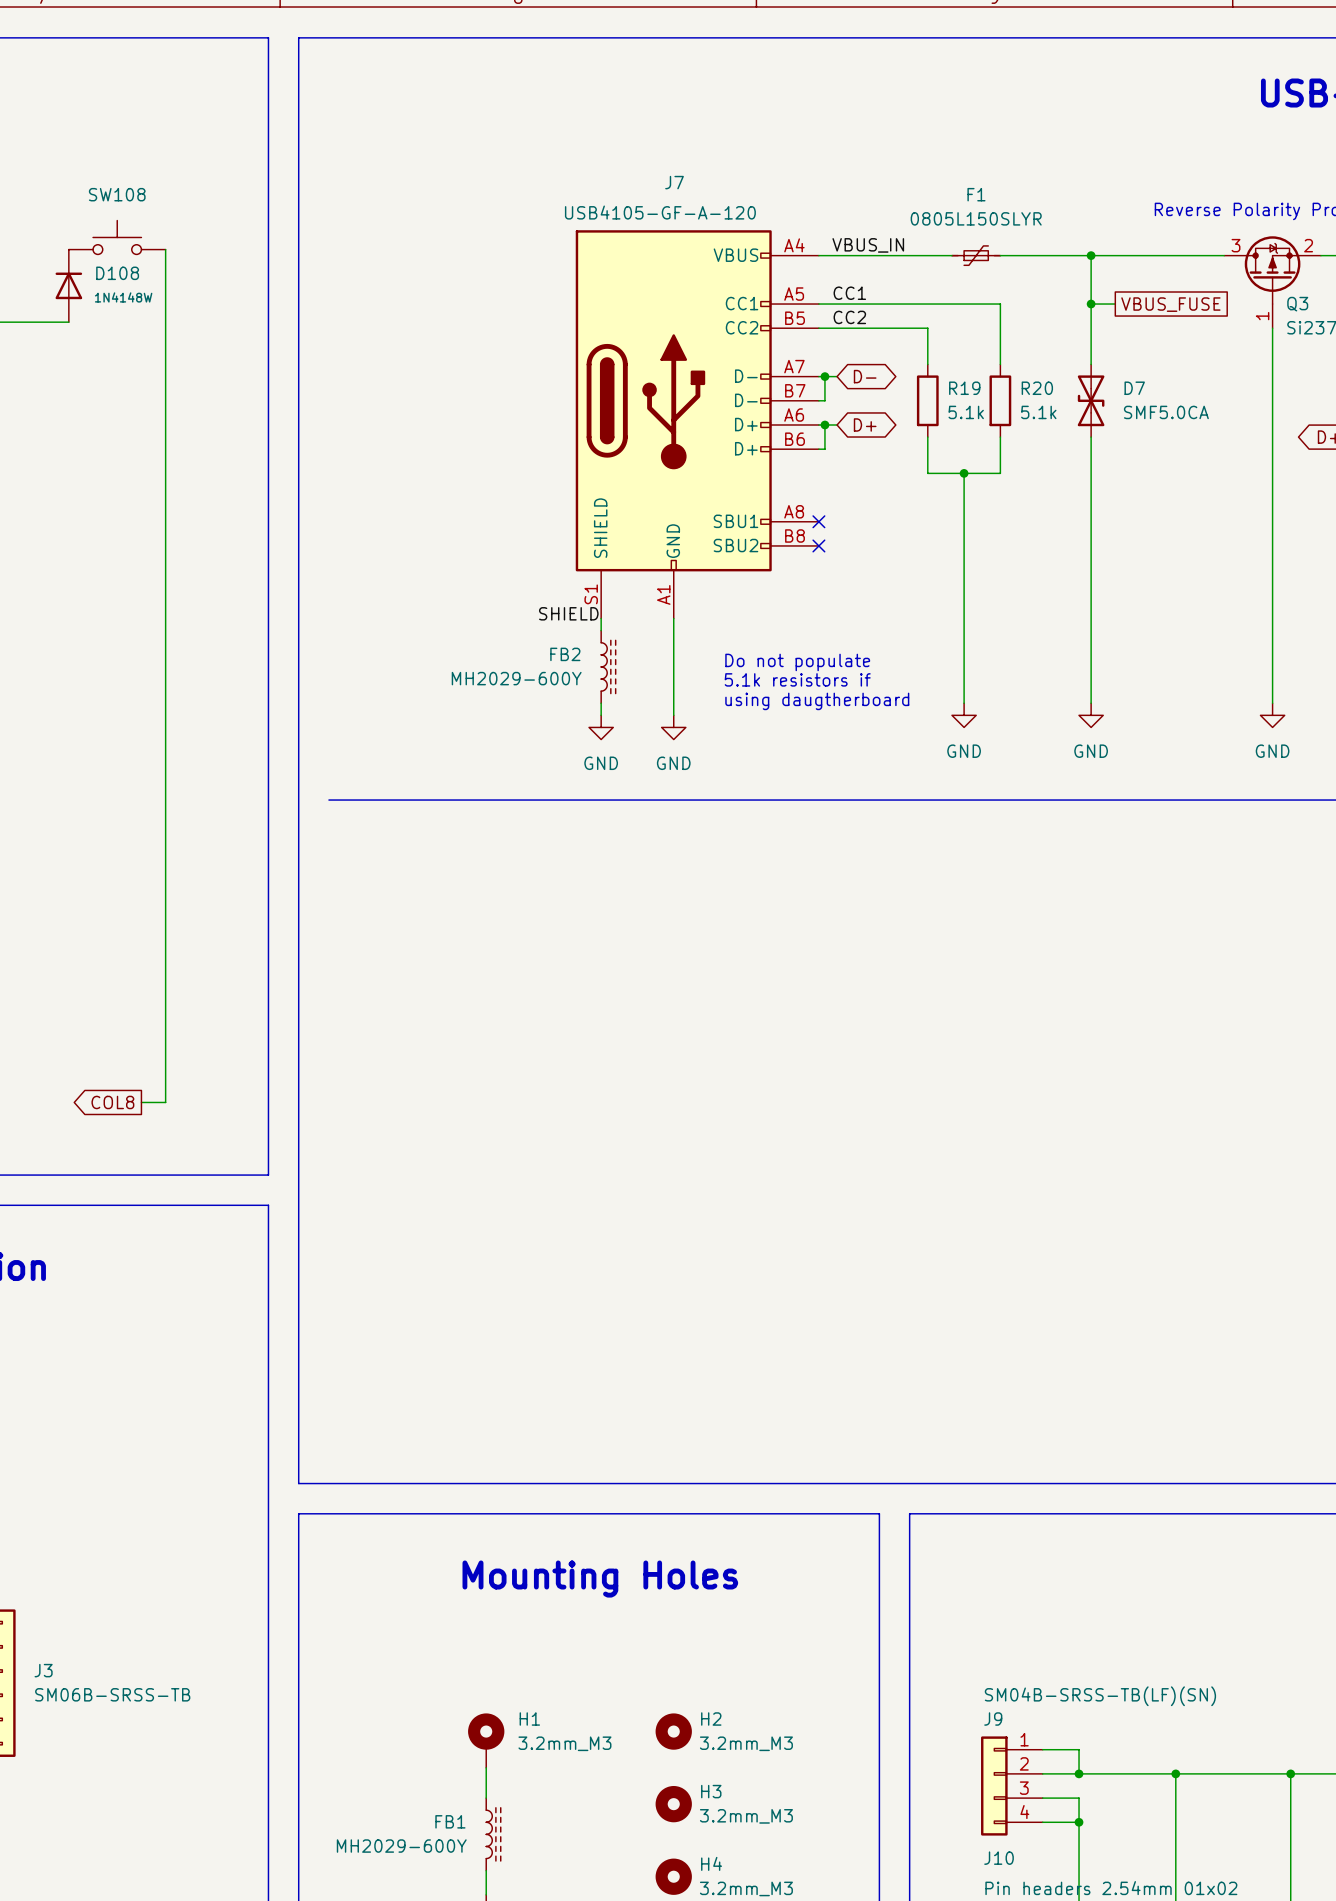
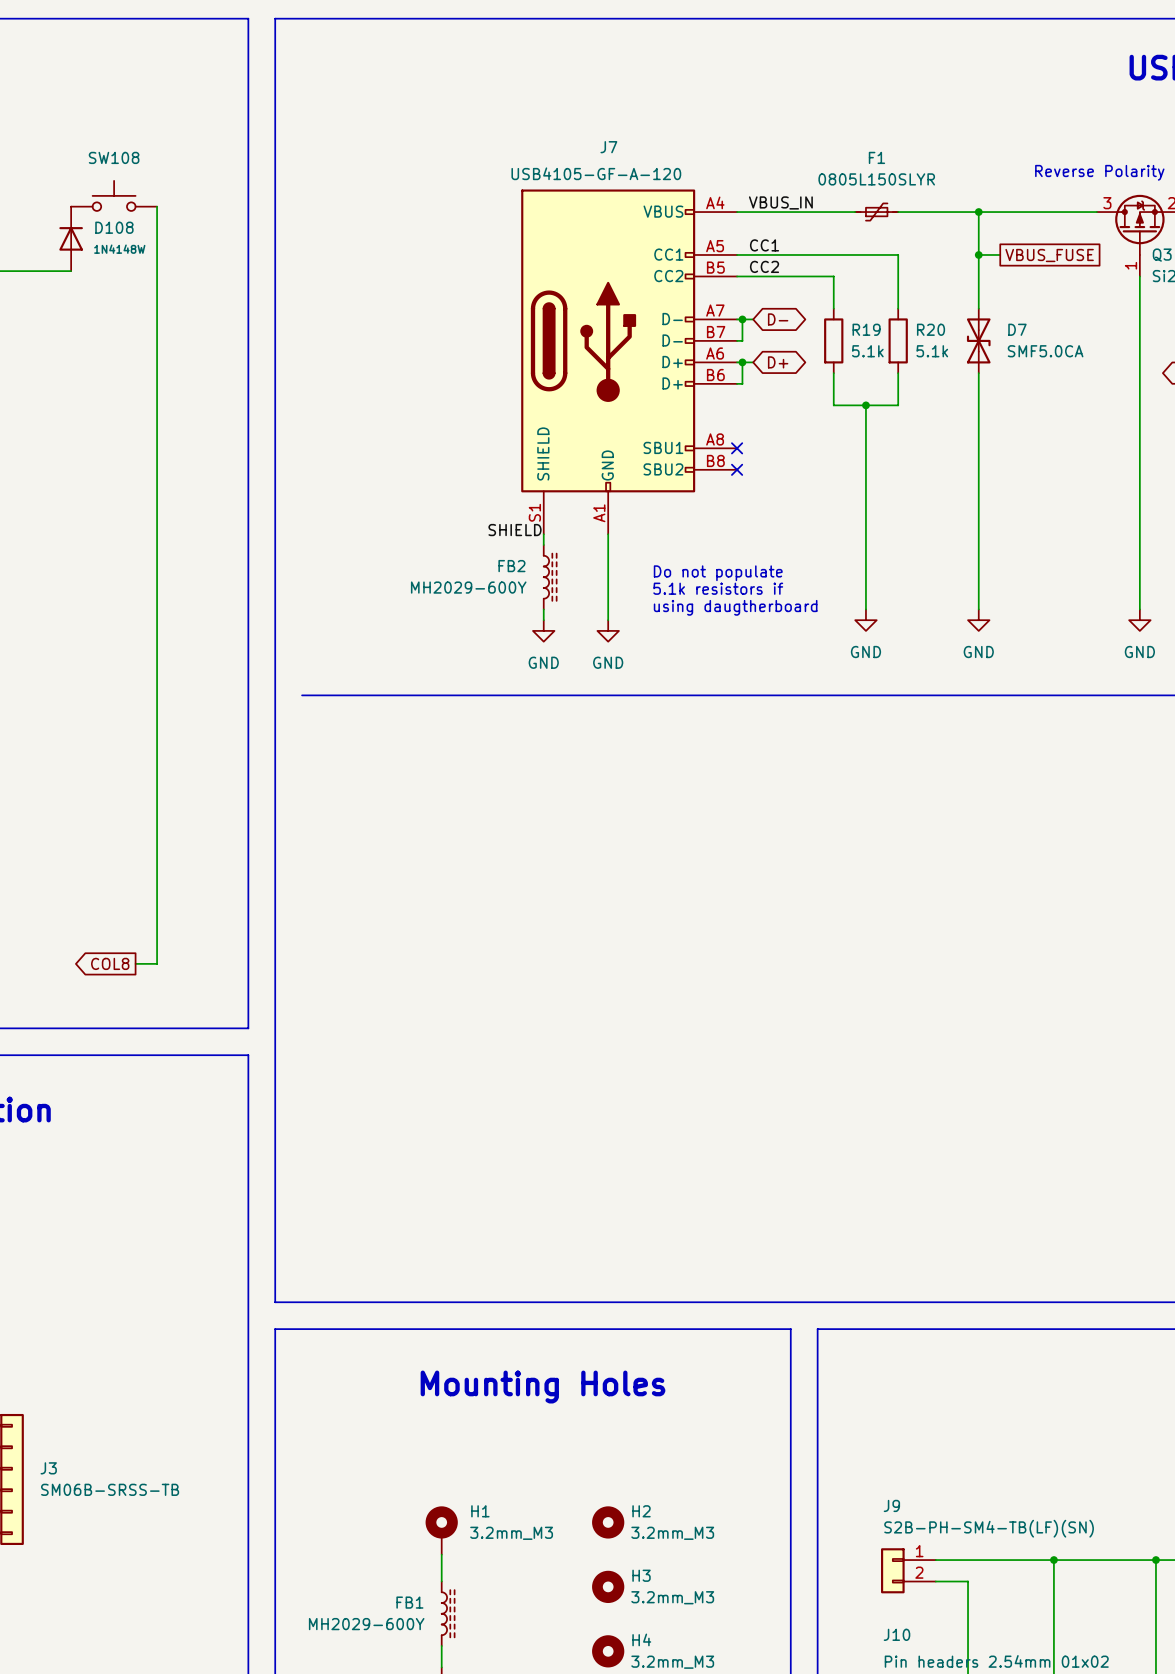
J9 value: SM04B-SRSS-TB(LF)(SN) (1100, 1696) -> S2B-PH-SM4-TB(LF)(SN) (989, 1528)
J9 symbol: [981, 1736, 1043, 1836] -> [881, 1548, 936, 1594]
wire: (1042, 1749) (1079, 1749) (1079, 1773) -> none
junction: (1079, 1773) -> none
wire: (1042, 1822) (1079, 1822) -> none
junction: (1079, 1822) -> none

